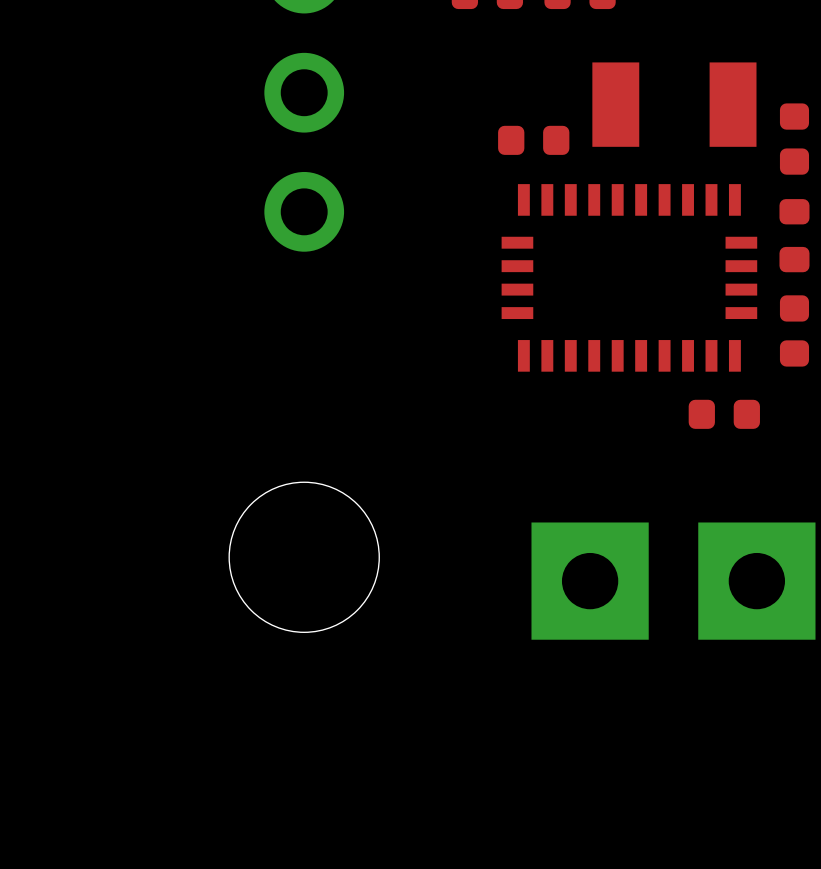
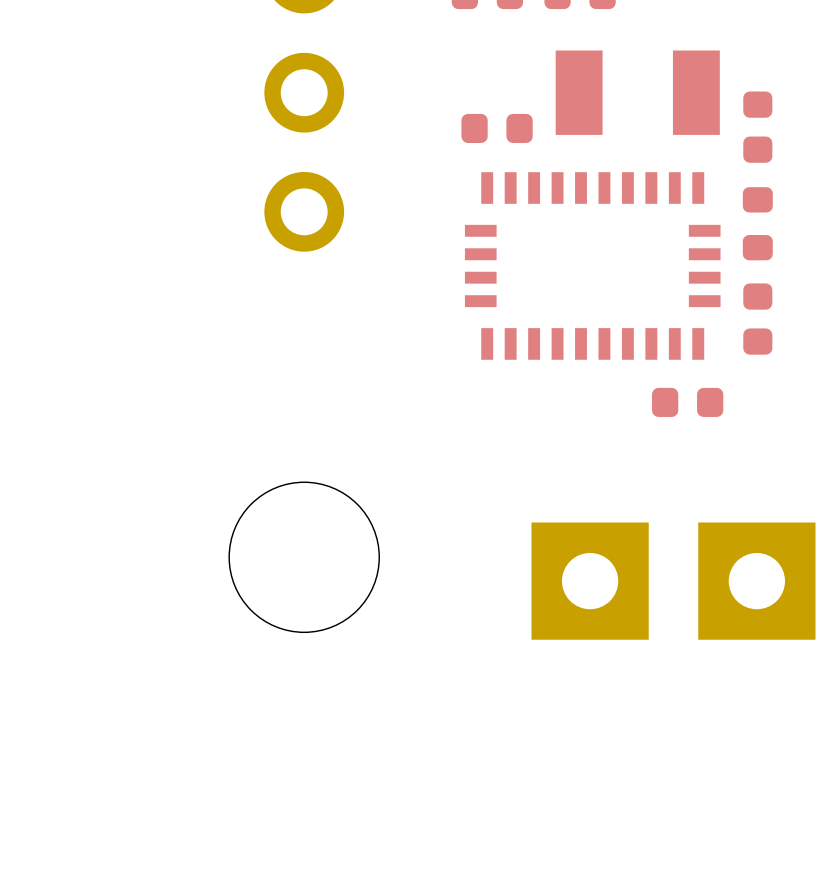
part position: (674, 104) -> (637, 92)
part position: (794, 139) -> (757, 127)
part position: (533, 140) -> (497, 128)
part position: (794, 235) -> (757, 223)
part position: (629, 277) -> (592, 265)
part position: (794, 330) -> (757, 319)
part position: (724, 414) -> (687, 402)

